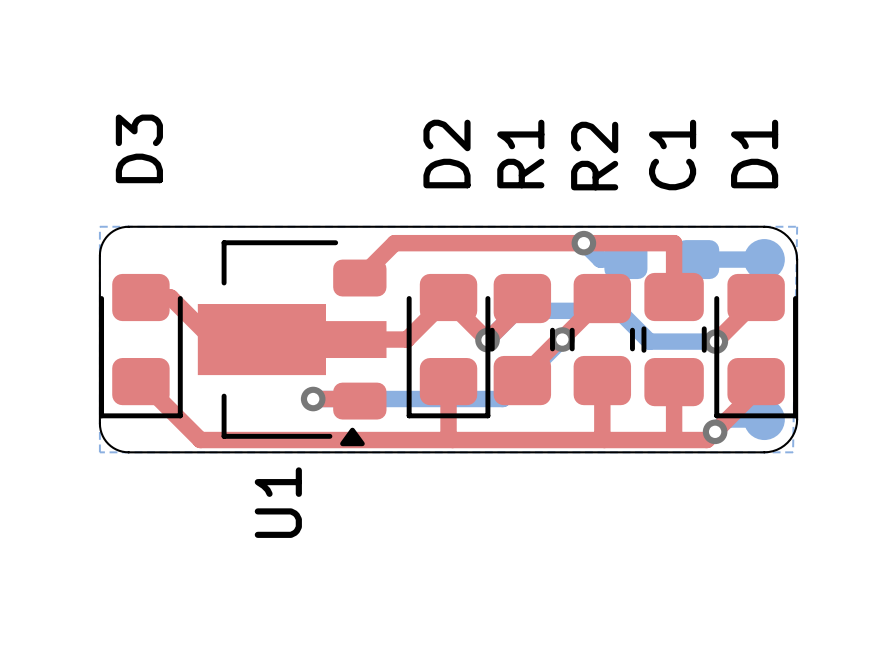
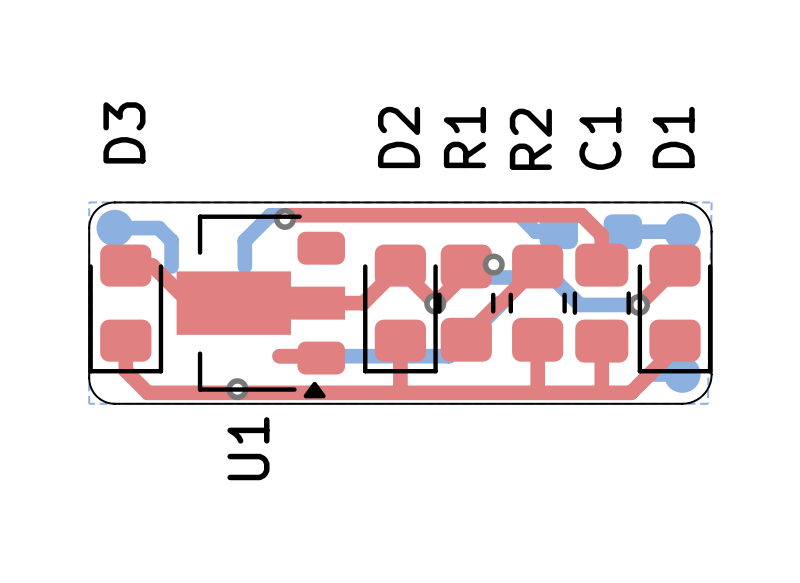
via: (583, 243) -> none
bottom track: none -> (285, 218) (281, 215) (270, 215) (244, 240) (244, 266)
via: none -> (285, 218)
bottom track: none -> (114, 228) (158, 228) (171, 240) (171, 266)
part: none -> (114, 228)
top track: (674, 263) (674, 243) (394, 243) (359, 278) -> (601, 235) (581, 215) (288, 215) (285, 218)
via: none -> (493, 264)
via: (562, 339) -> none
top track: (140, 380) (200, 440) -> (125, 339) (125, 370) (147, 392) (178, 392)
via position: (313, 399) -> (237, 389)
via: (715, 431) -> none

